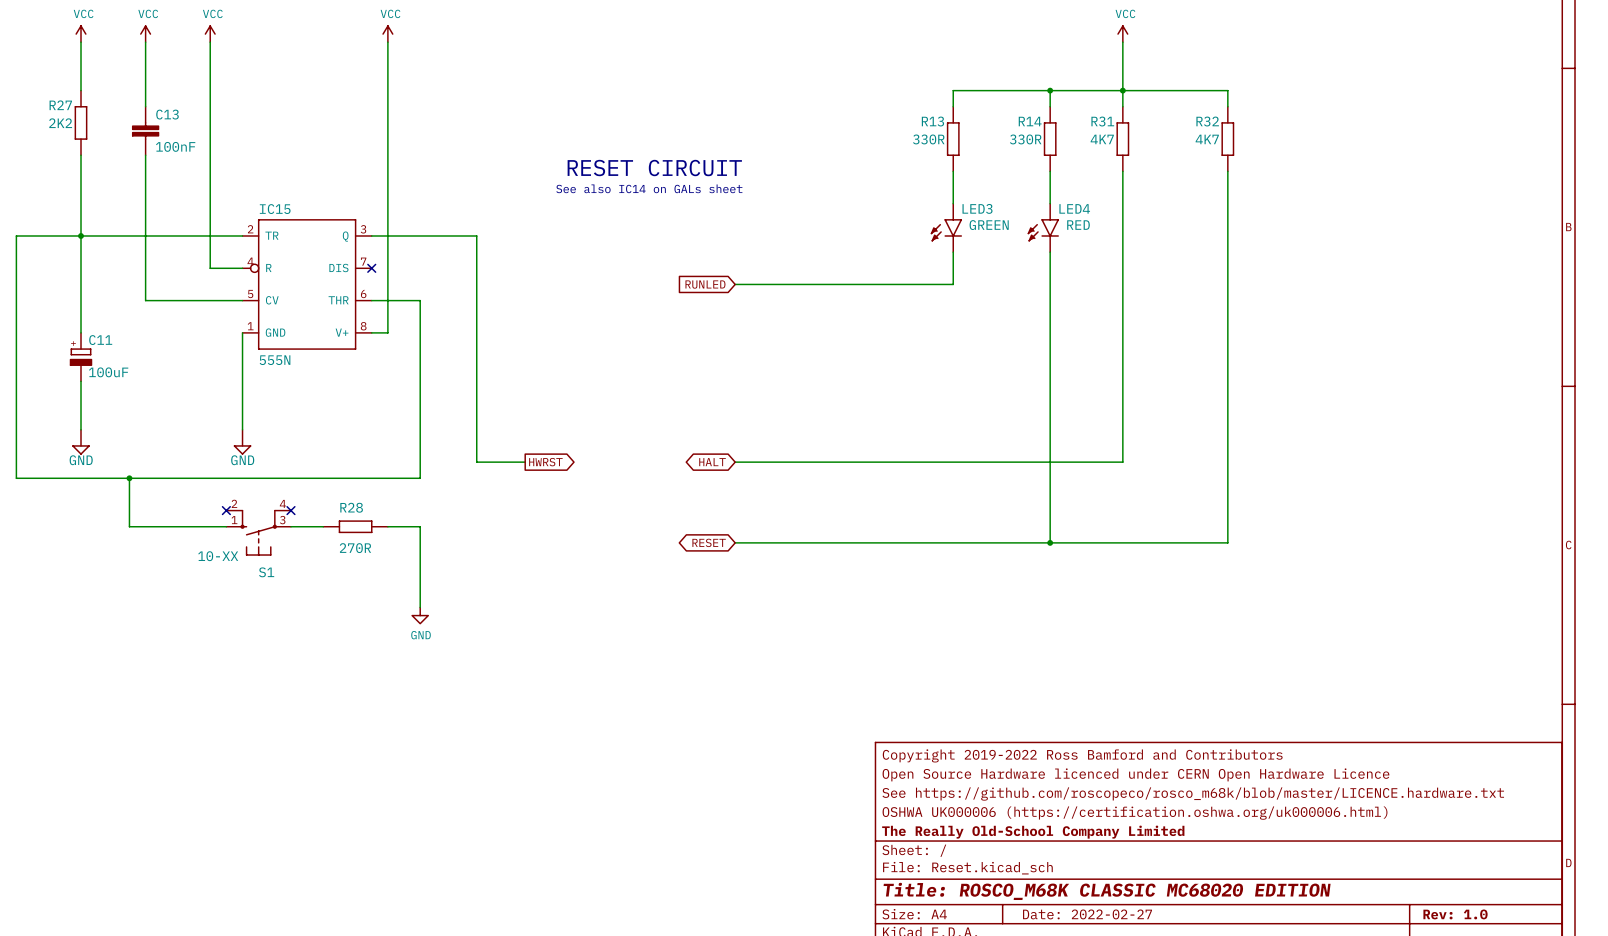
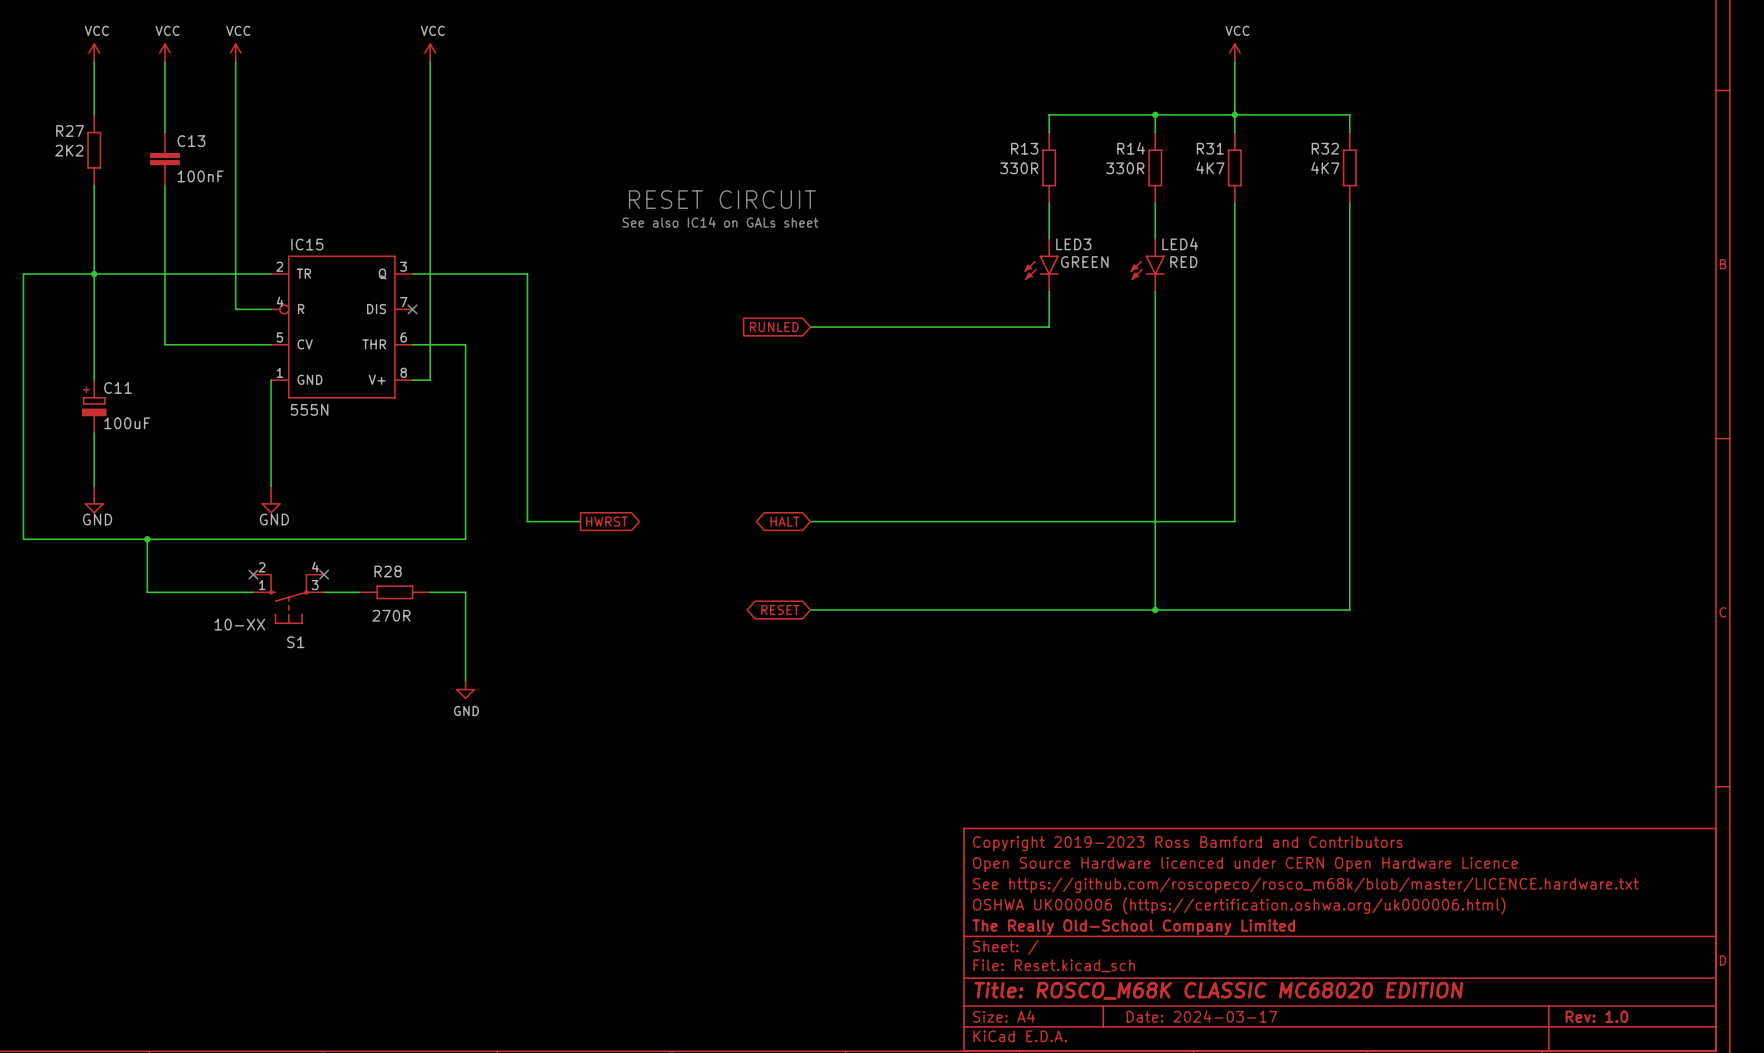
title block: Copyright 2019-2022 Ross Bamford and Contributors (1082, 755) -> Copyright 2019-2023 Ross Bamford and Contributors (1187, 843)
title block: Date: 2022-02-27 (1087, 914) -> Date: 2024-03-17 (1201, 1016)

